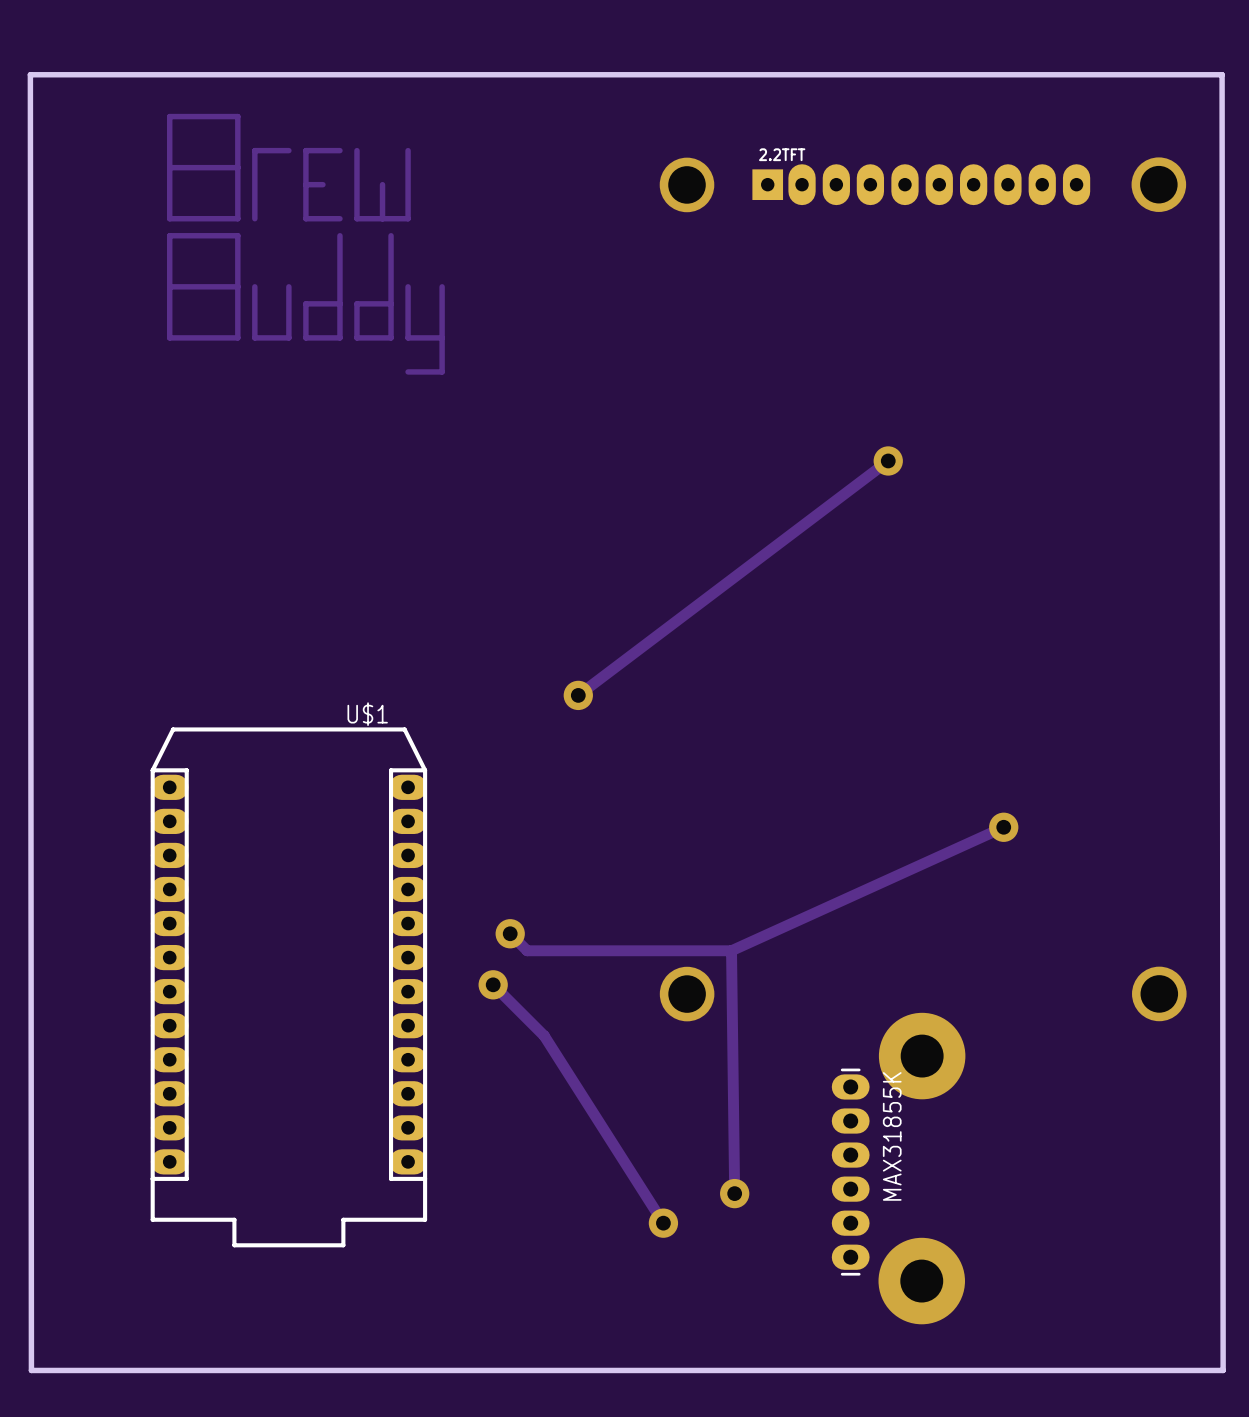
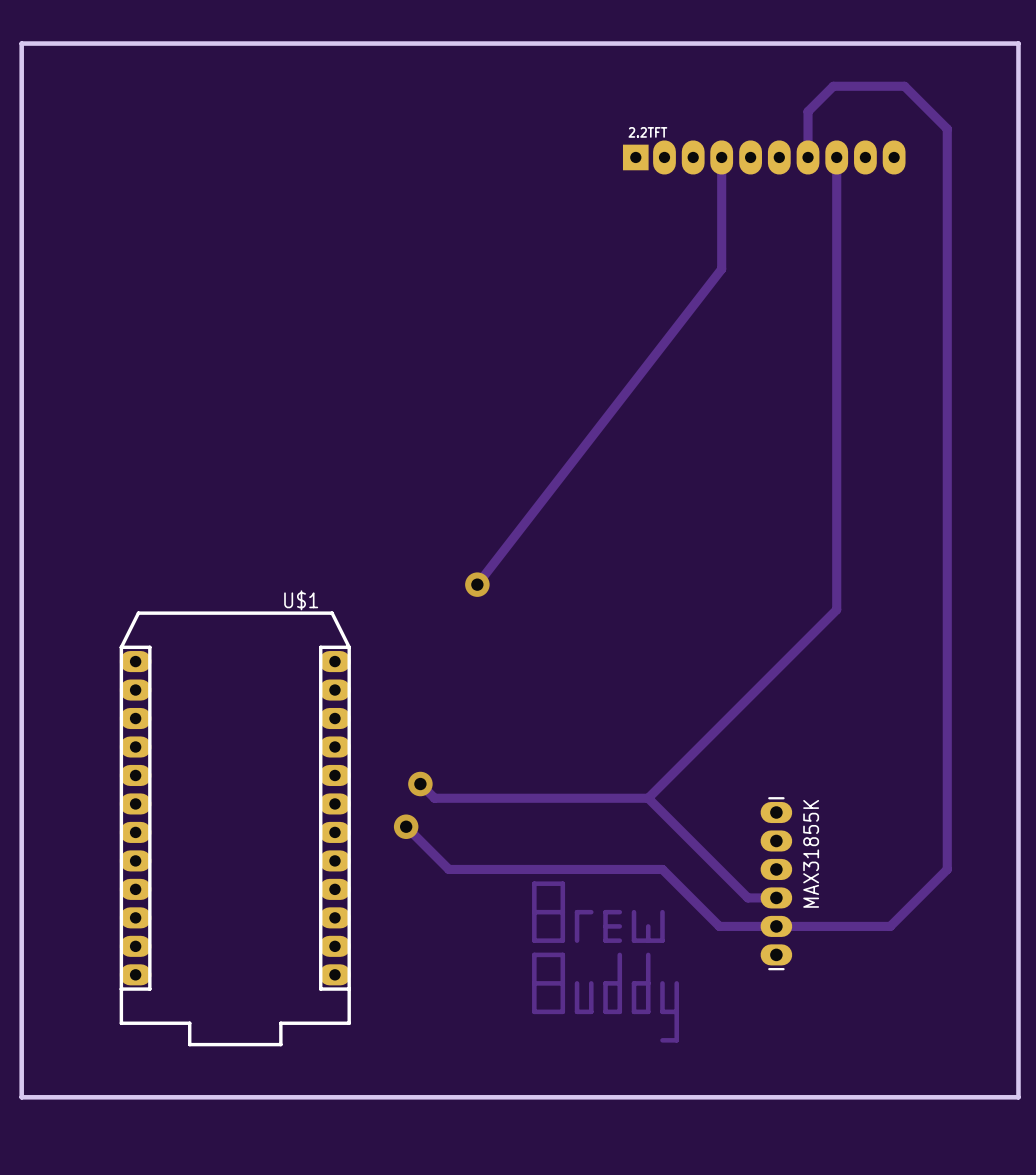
board edge: (30, 74) (31, 1370) (1223, 1370) (1222, 74) (30, 74) -> (21, 43) (21, 1097) (1018, 1097) (1018, 43) (21, 43)
track: (169, 116) (169, 218) (237, 218) (237, 116) (169, 116) -> none
track: (288, 150) (254, 150) (254, 218) -> none
track: (339, 150) (305, 150) (305, 218) (339, 218) -> none
track: (356, 150) (356, 218) (408, 218) (408, 150) -> none
track: (169, 167) (237, 167) -> none
track: (305, 184) (322, 184) -> none
track: (382, 184) (382, 218) -> none
via: (687, 184) -> none
track: none -> (836, 157) (836, 609) (648, 798)
via: (1158, 184) -> none
track: (169, 235) (169, 337) (237, 337) (237, 235) (169, 235) -> none
track: (339, 235) (339, 337) (305, 337) (305, 303) (339, 303) -> none
track: (391, 235) (391, 337) (356, 337) (356, 303) (391, 303) -> none
track: (169, 286) (237, 286) -> none
track: (254, 286) (254, 337) (288, 337) (288, 286) -> none
track: (408, 286) (408, 337) (442, 337) -> none
track: (442, 286) (442, 371) (408, 371) -> none
track: (888, 460) (578, 695) -> (721, 157) (721, 269) (477, 584)
via: (888, 460) -> none
track: (1003, 827) (731, 950) (734, 1193) -> none
via: (1003, 827) -> none
track: none -> (605, 798) (648, 798)
track: none -> (648, 798) (747, 897) (776, 897)
via: (1159, 993) -> none
via: (687, 994) -> none
track: (544, 1035) (663, 1223) -> (448, 869) (662, 869) (719, 926) (890, 926) (947, 869) (947, 128) (904, 86) (833, 86) (808, 111) (808, 157)
track: none -> (534, 883) (534, 940) (562, 940) (562, 883) (534, 883)
via: (922, 1056) -> none
track: none -> (534, 912) (562, 912)
track: none -> (591, 912) (577, 912) (577, 940)
track: none -> (619, 912) (605, 912) (605, 940) (619, 940)
track: none -> (634, 912) (634, 940) (662, 940) (662, 912)
track: none -> (605, 926) (619, 926)
track: none -> (648, 926) (648, 940)
track: none -> (534, 954) (534, 1011) (562, 1011) (562, 954) (534, 954)
track: none -> (619, 954) (619, 1011) (605, 1011) (605, 983) (619, 983)
track: none -> (648, 954) (648, 1011) (634, 1011) (634, 983) (648, 983)
track: none -> (534, 983) (562, 983)
track: none -> (577, 983) (577, 1011) (591, 1011) (591, 983)
track: none -> (662, 983) (662, 1011) (676, 1011)
track: none -> (676, 983) (676, 1040) (662, 1040)
MAX31855K position: (850, 1172) -> (776, 883)
via: (734, 1193) -> none
via: (663, 1223) -> none
via: (921, 1281) -> none

